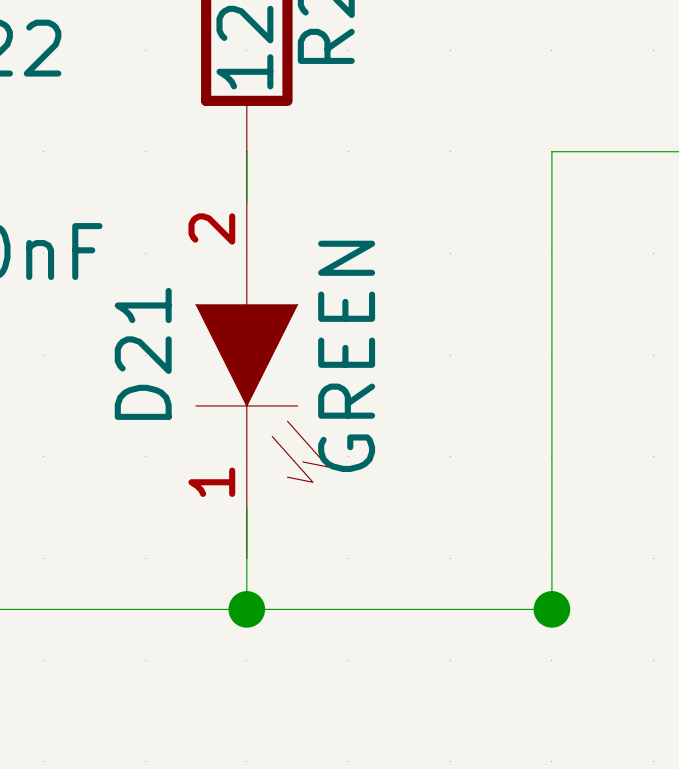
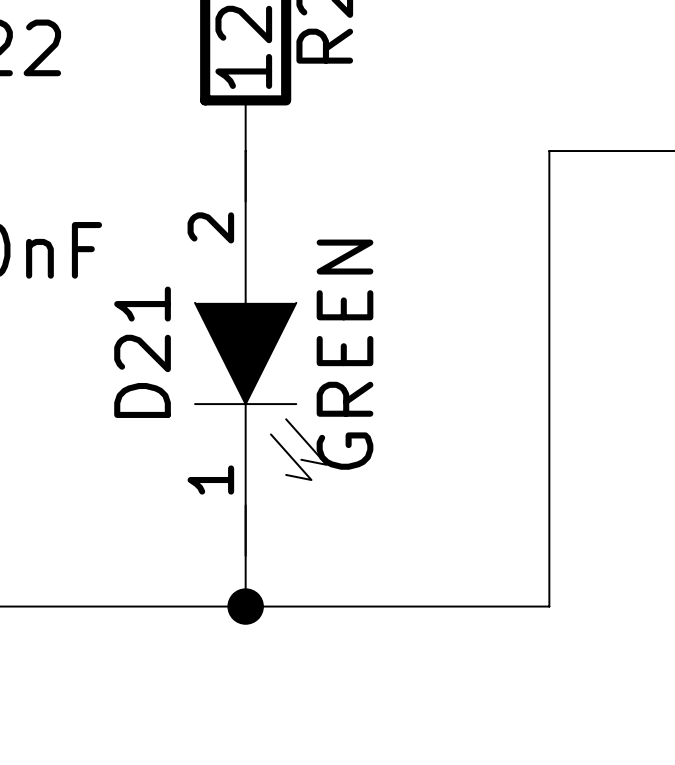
junction: (551, 609) -> none

